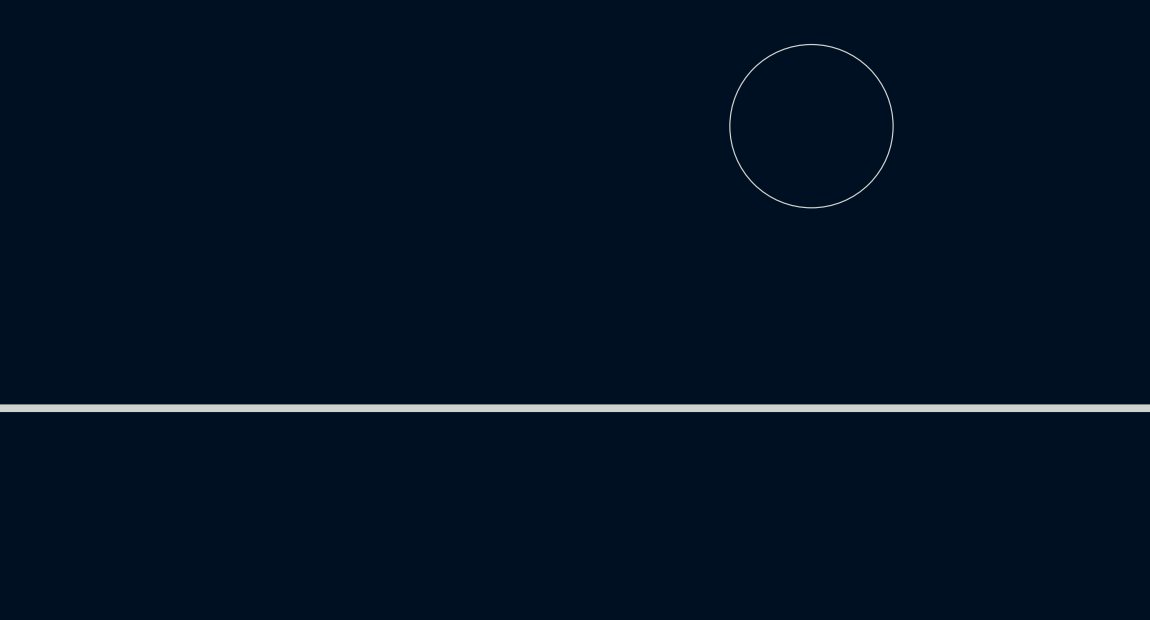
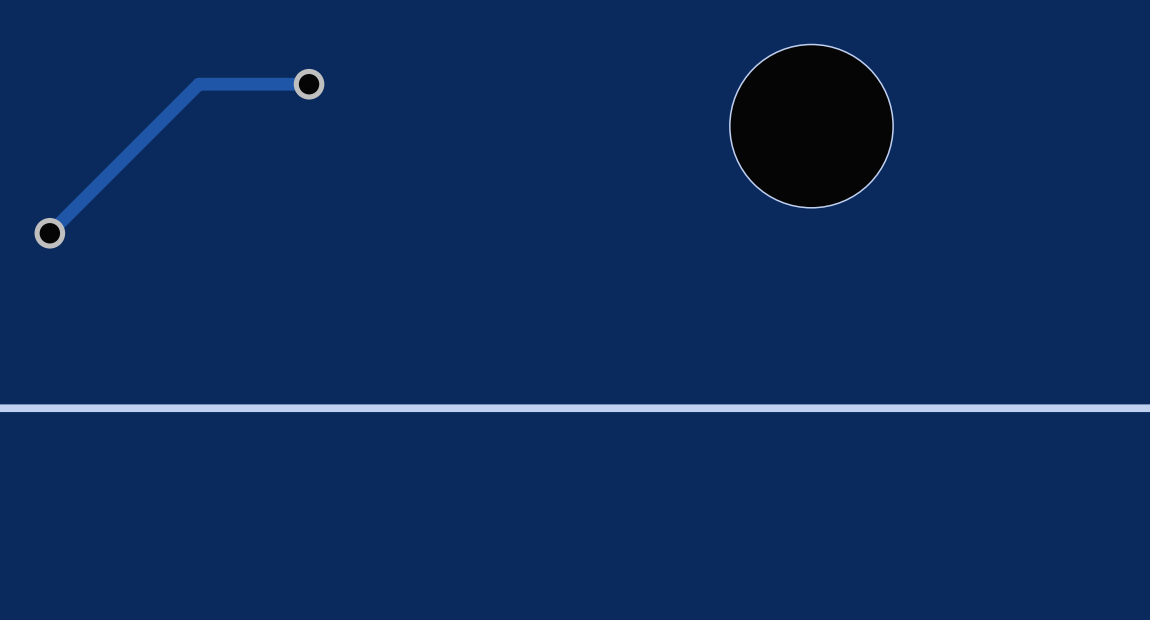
track: none -> (309, 84) (198, 84) (49, 233)
via: none -> (309, 84)
via: none -> (49, 233)

